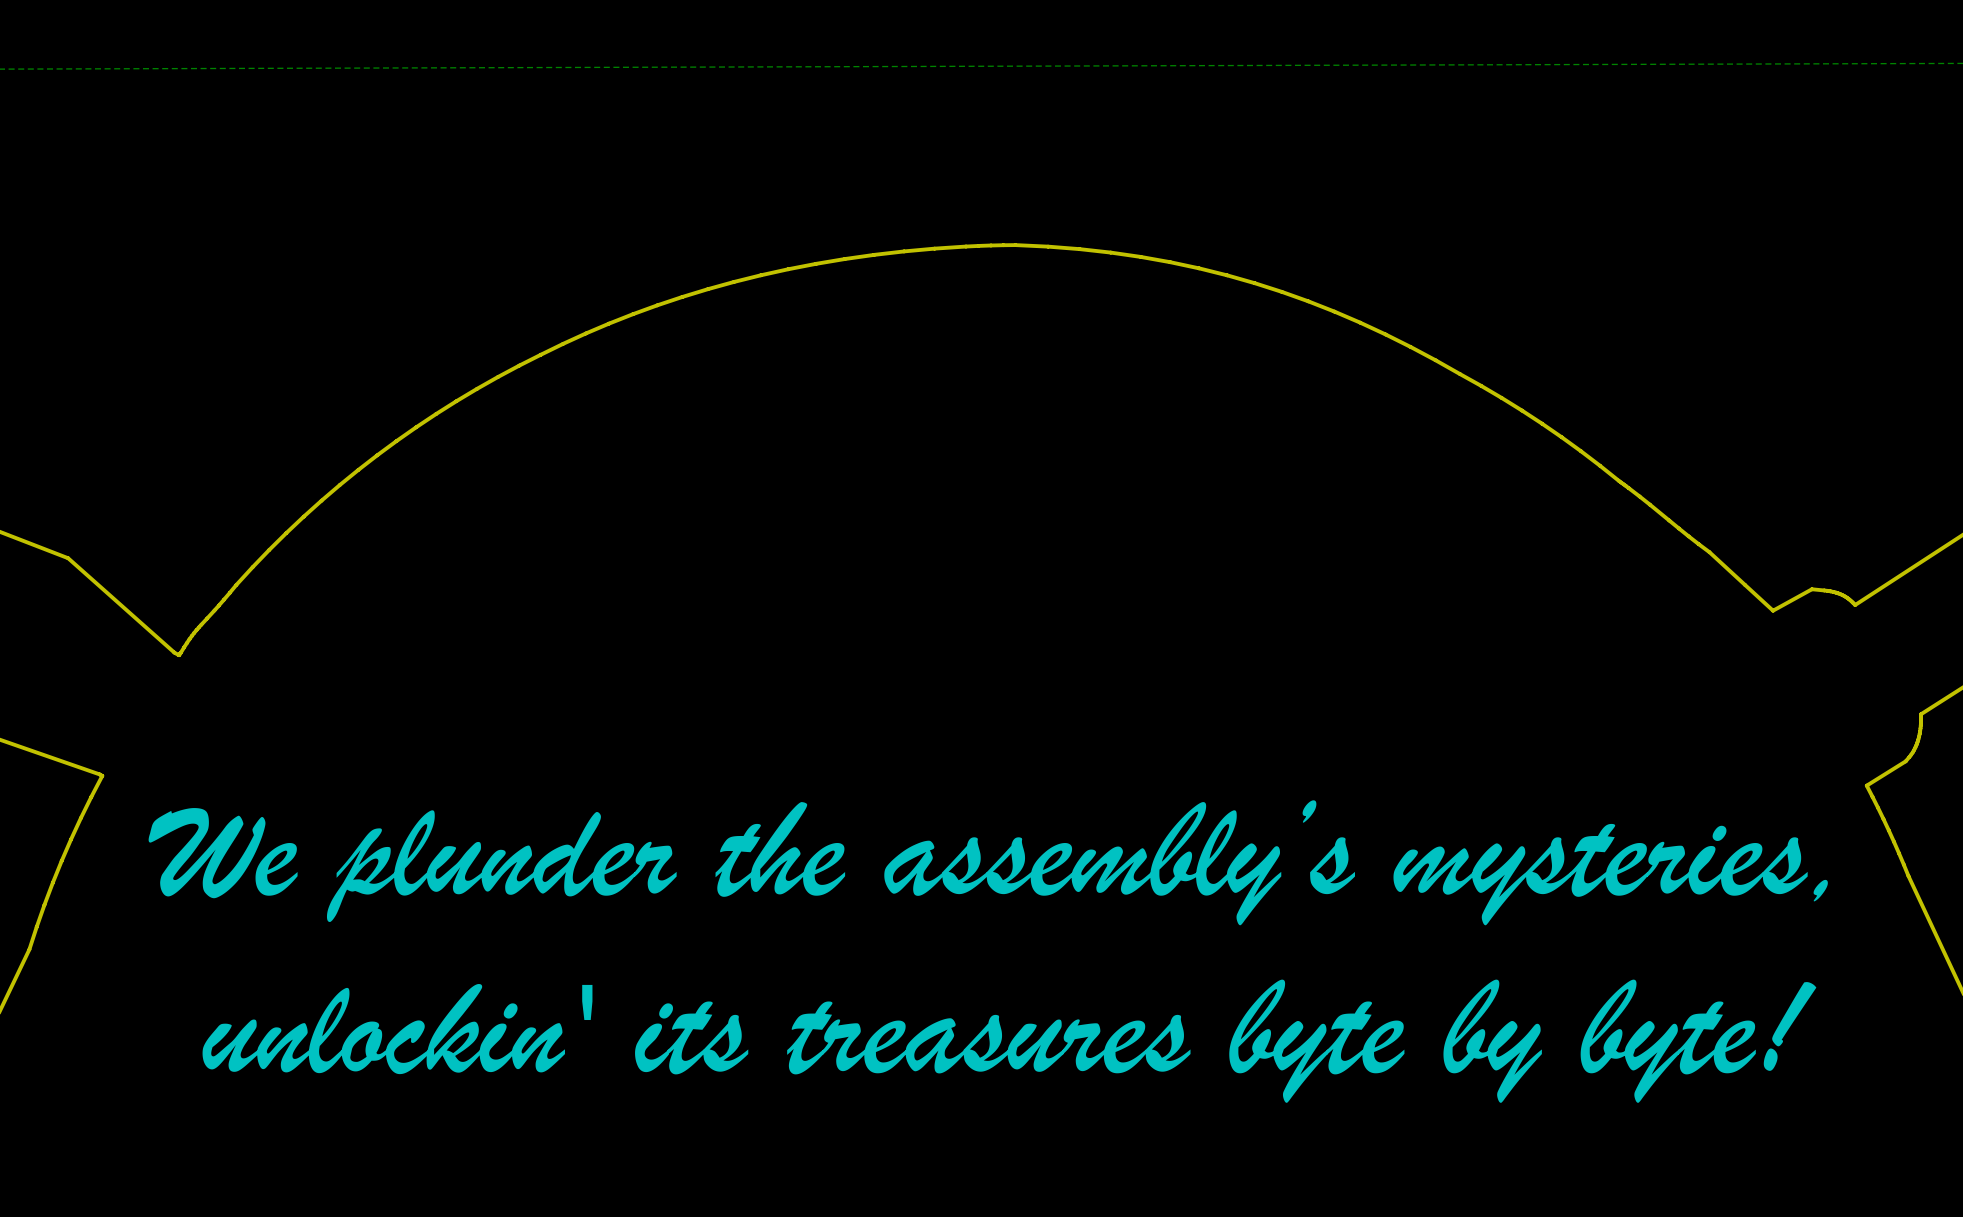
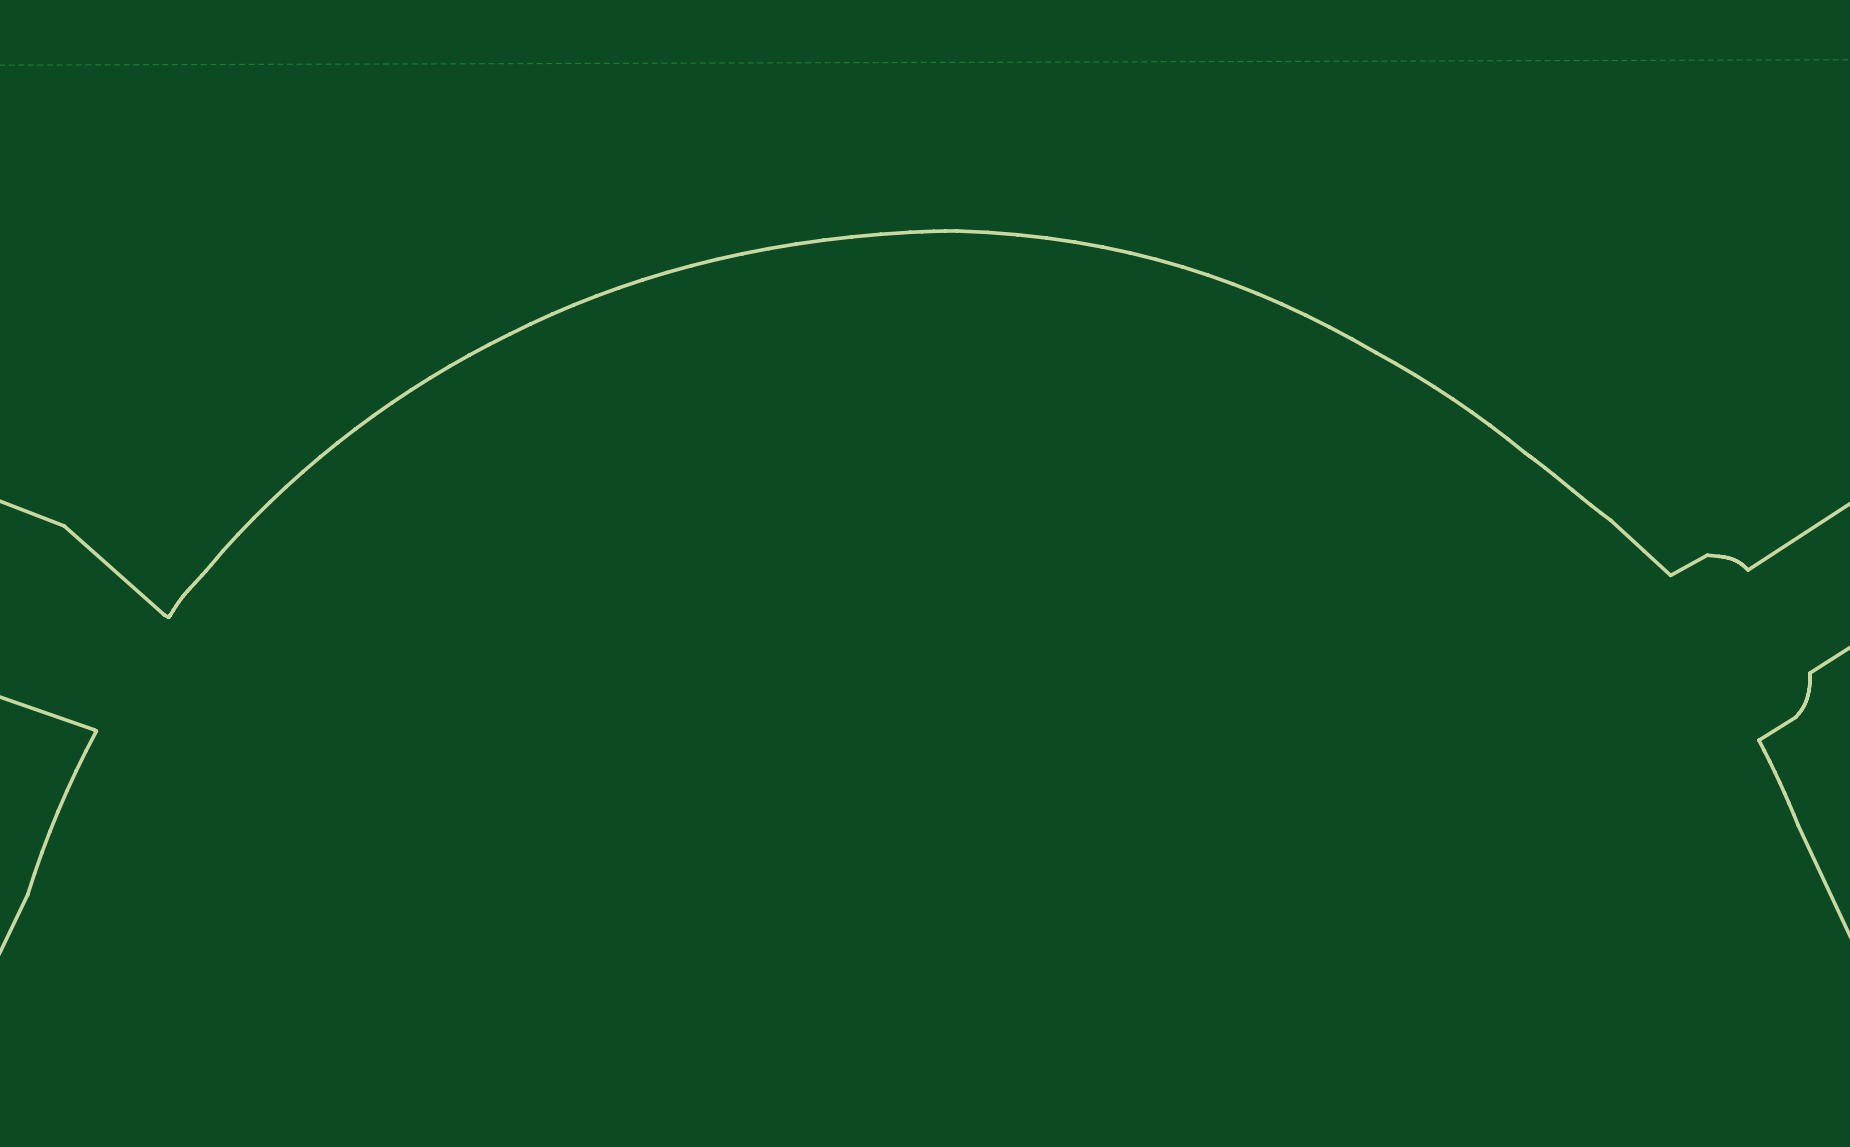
drawing: [148, 800, 1828, 1103] -> none

